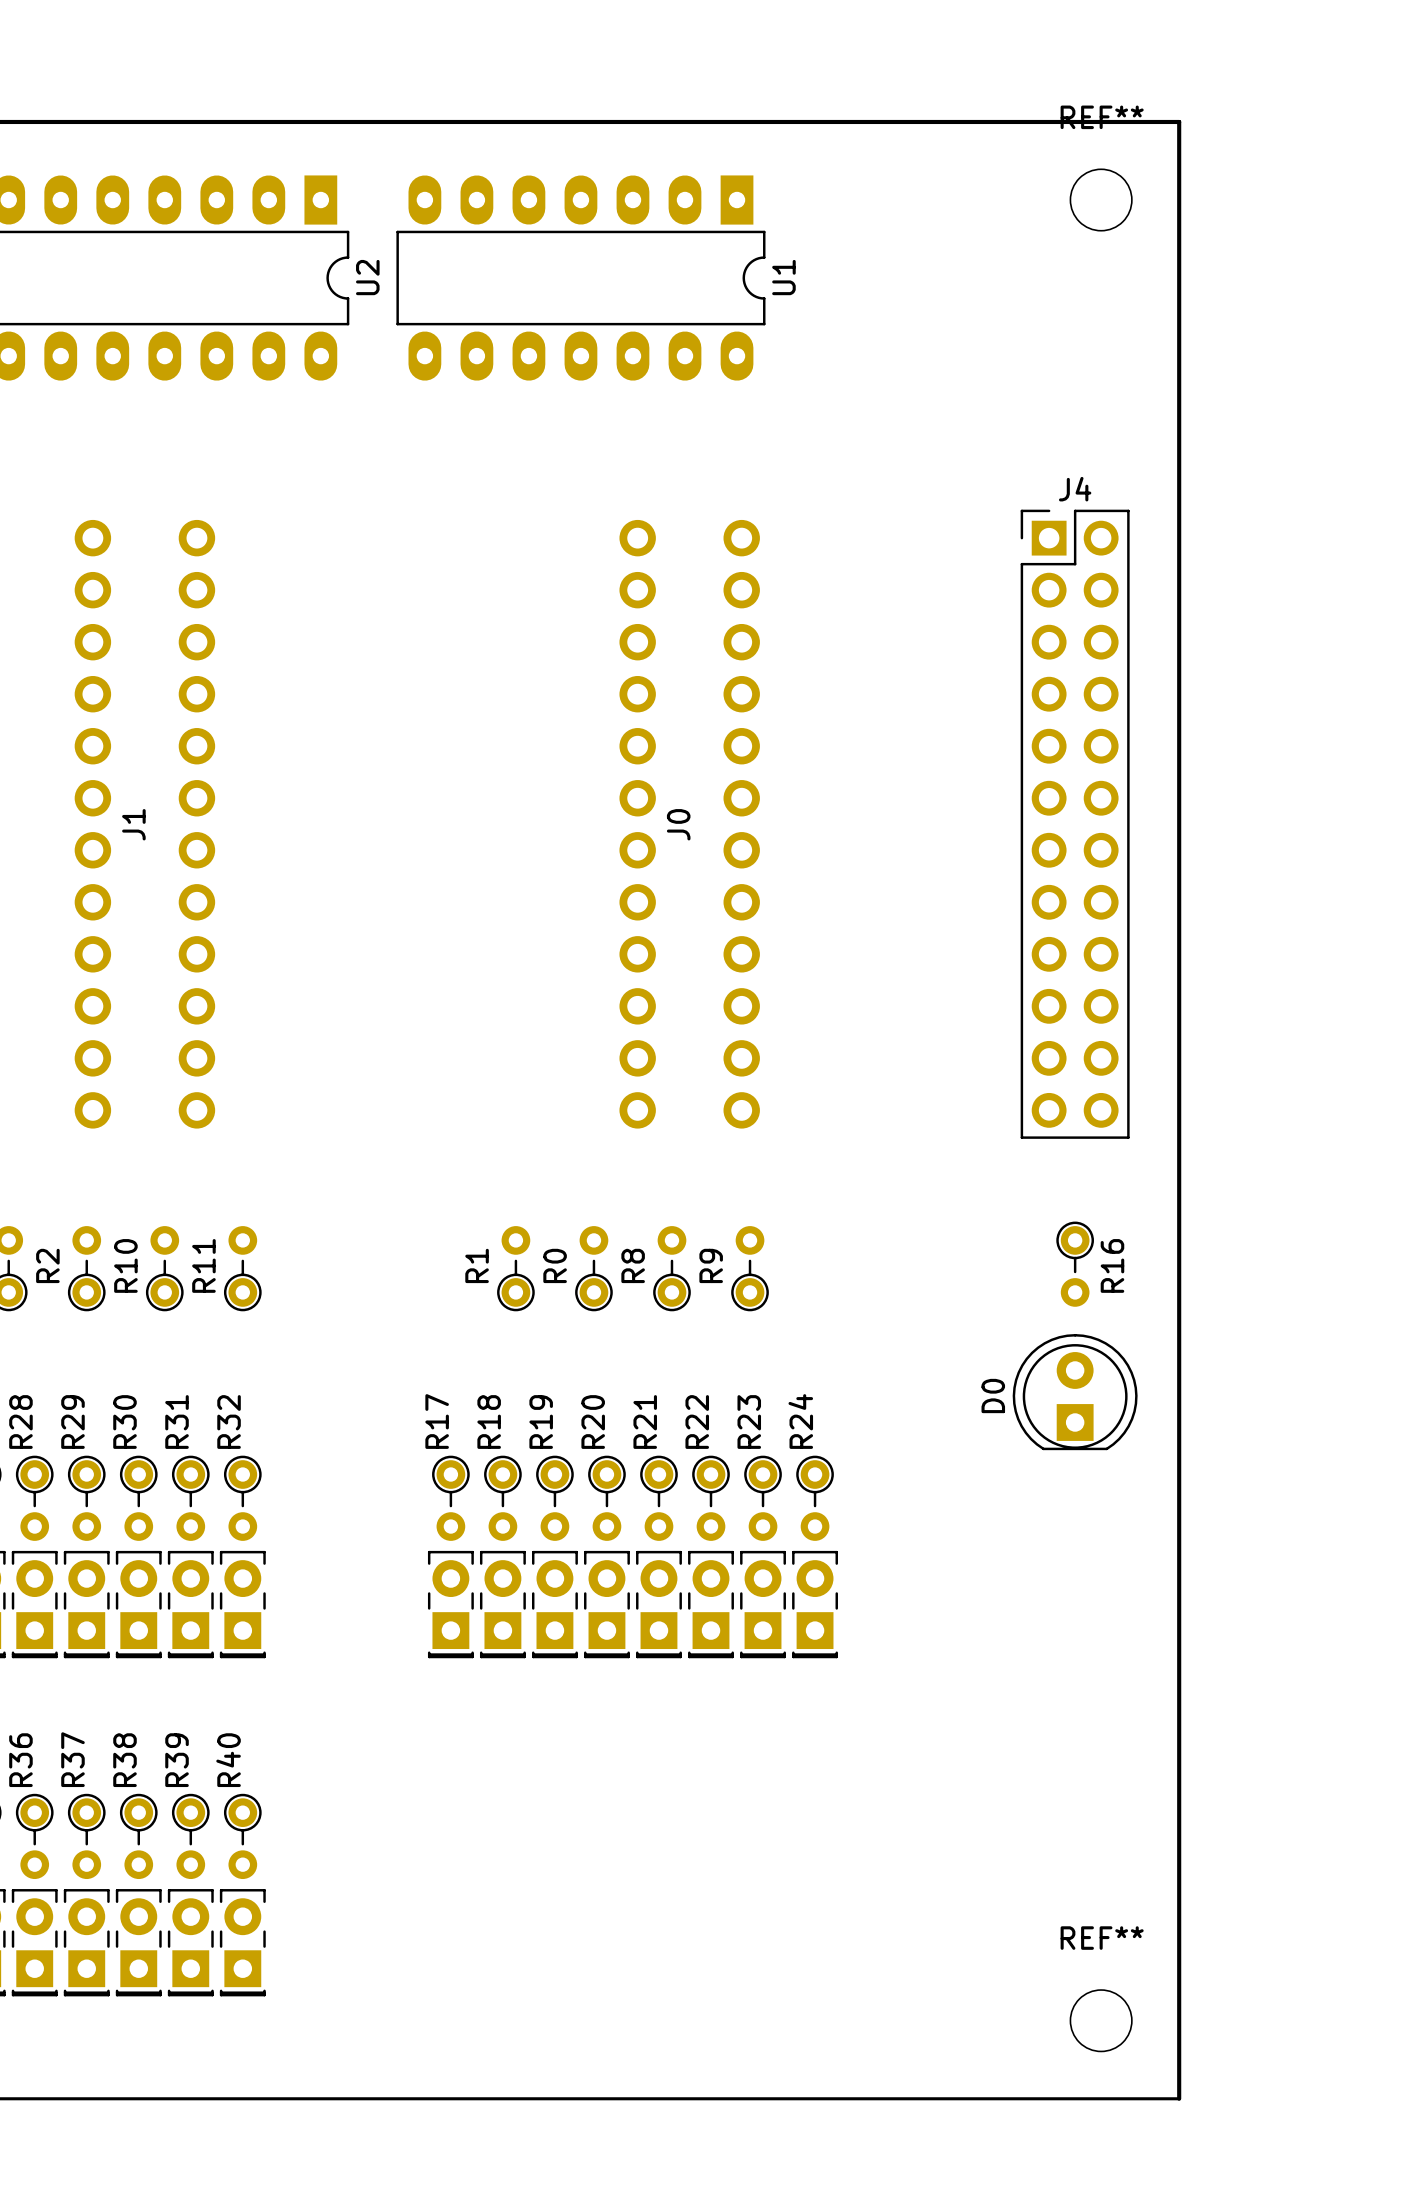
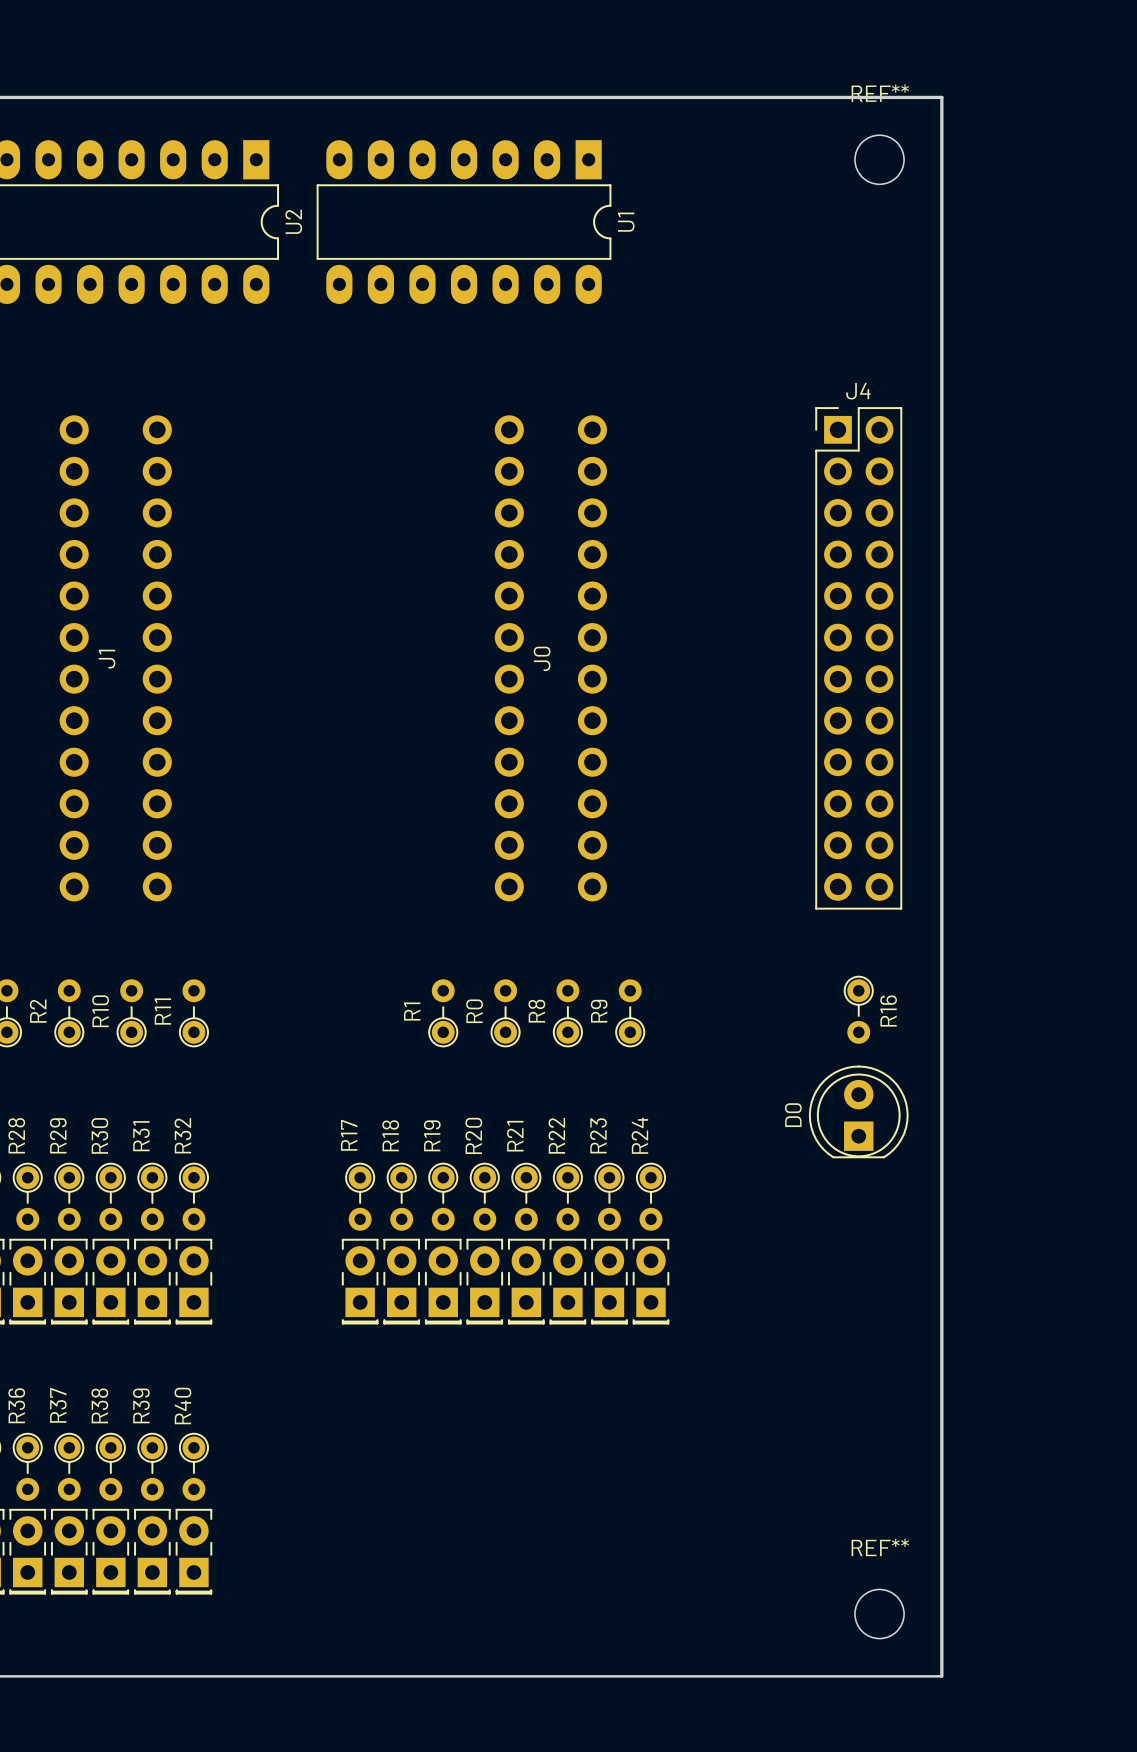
R1 position: (515, 1268) -> (443, 1013)
R0 position: (593, 1268) -> (505, 1013)
R8 position: (671, 1268) -> (567, 1013)
R9 position: (750, 1268) -> (630, 1013)

